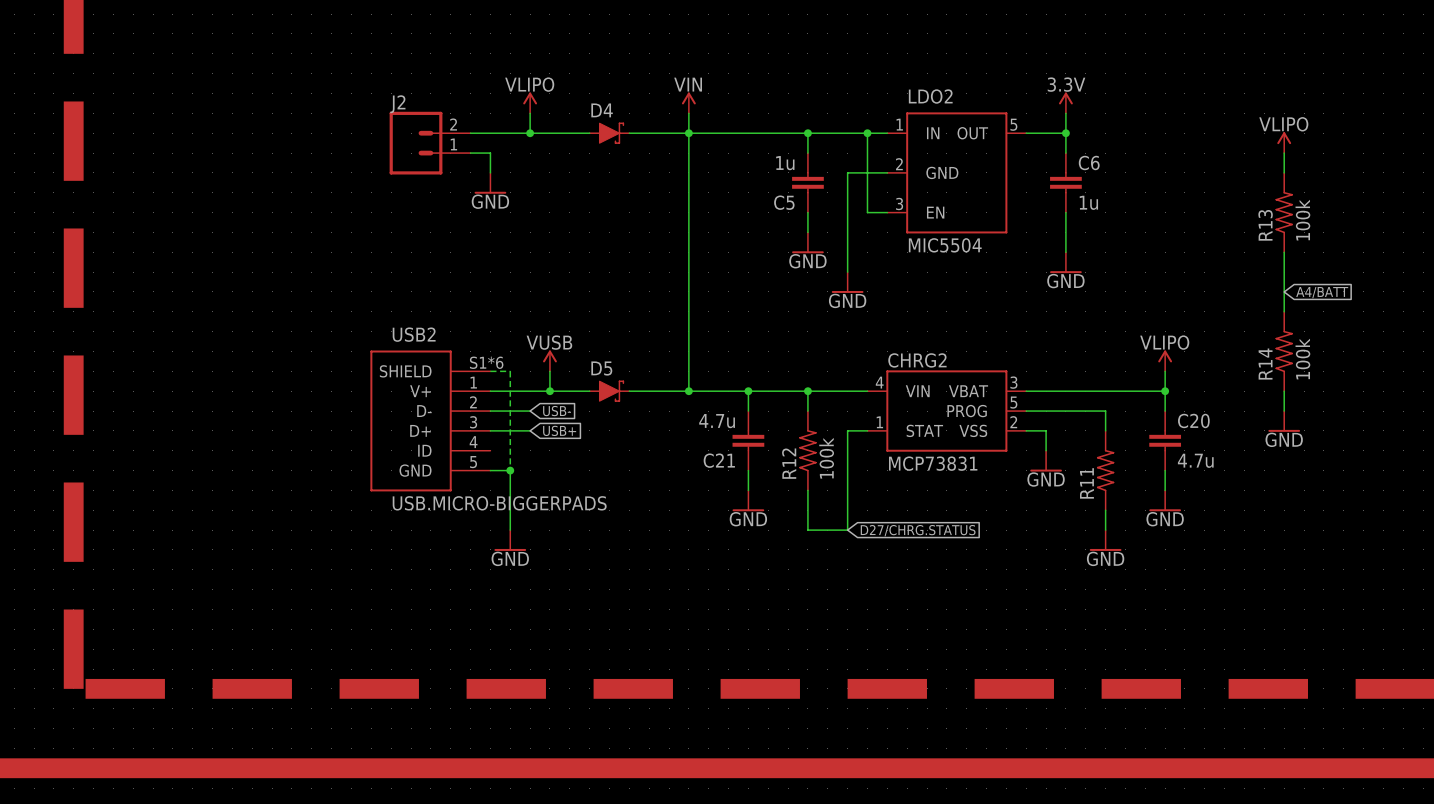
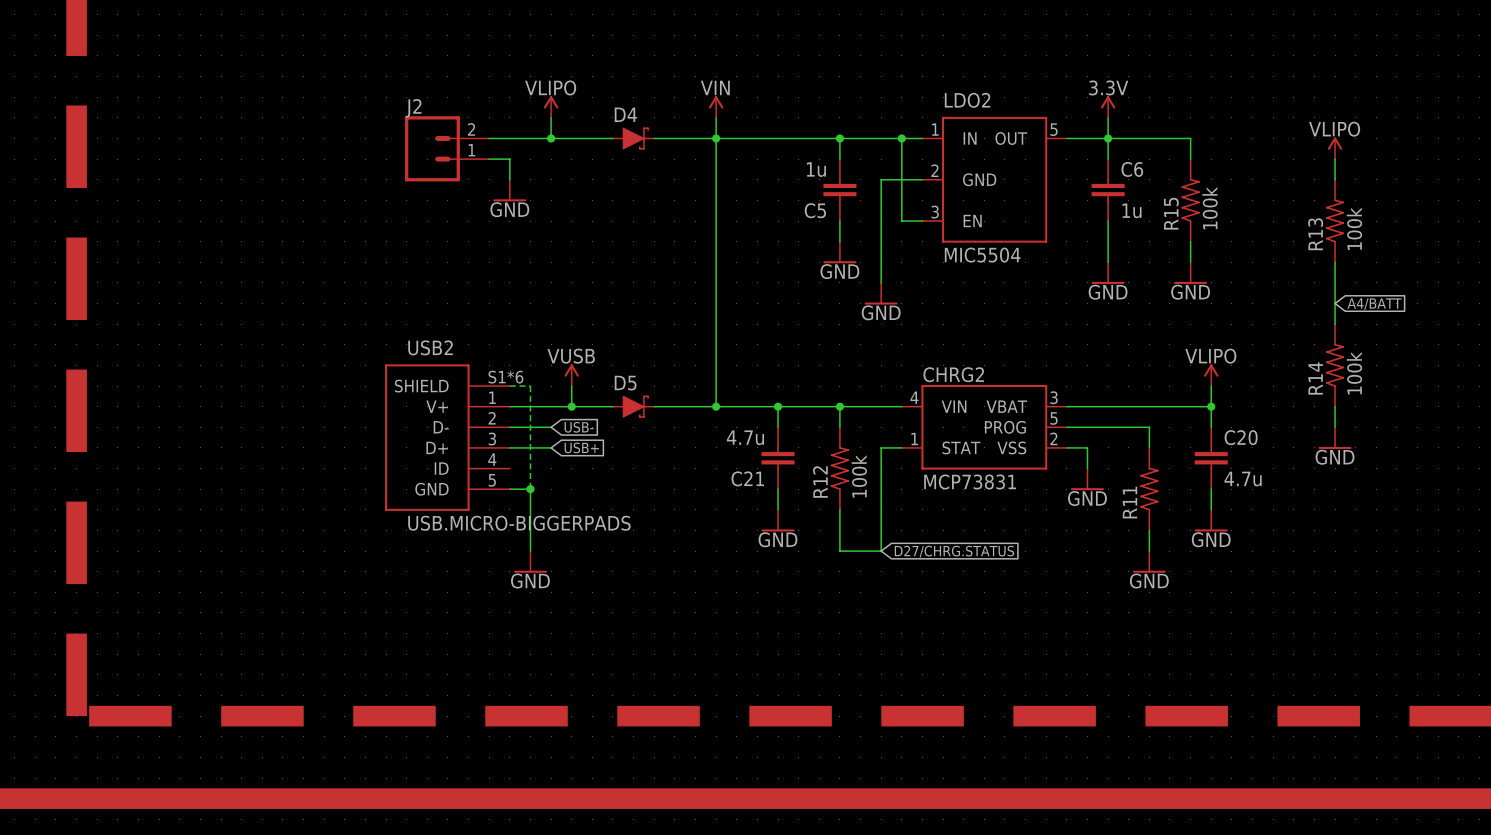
wire: none -> (1108, 138) (1190, 138) (1190, 159)
R15: none -> 100k (1190, 200)
wire: none -> (1190, 241) (1190, 262)
power symbol: none -> GND (1190, 273)

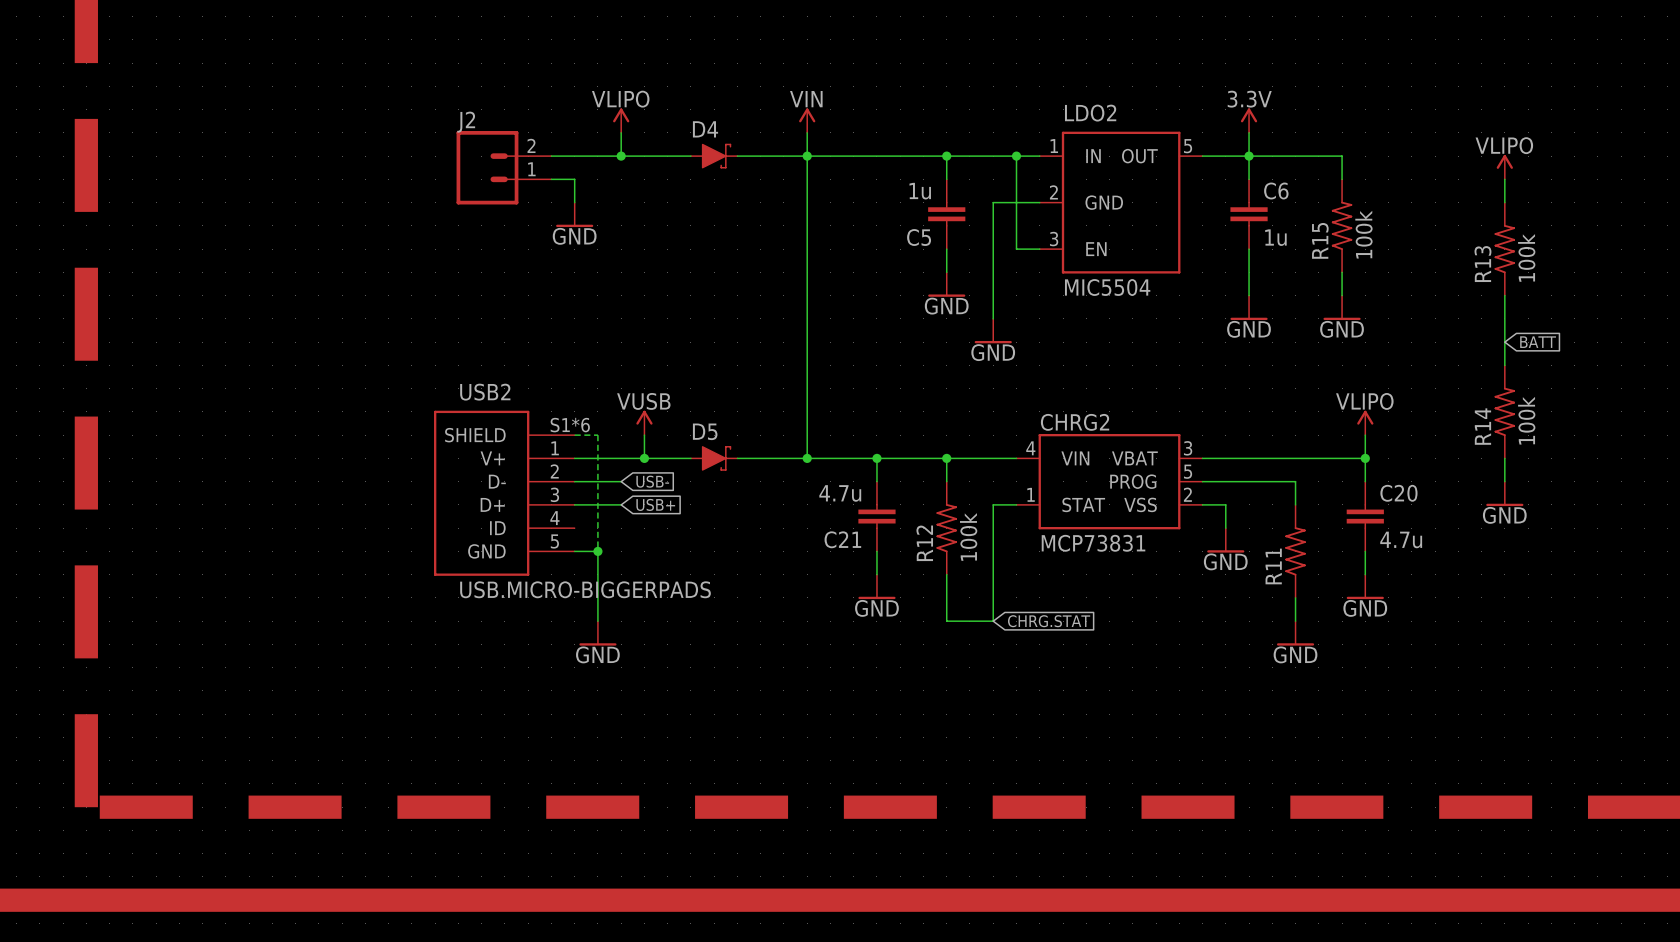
global label: A4/BATT (1374, 304) -> BATT (1538, 342)
global label: D27/CHRG.STATUS (954, 551) -> CHRG.STAT (1049, 621)

